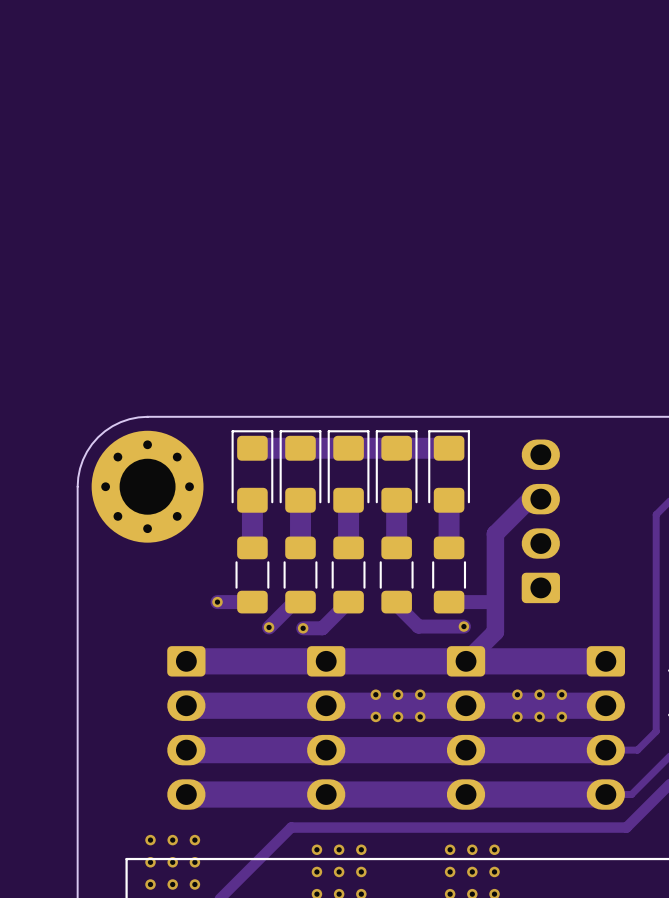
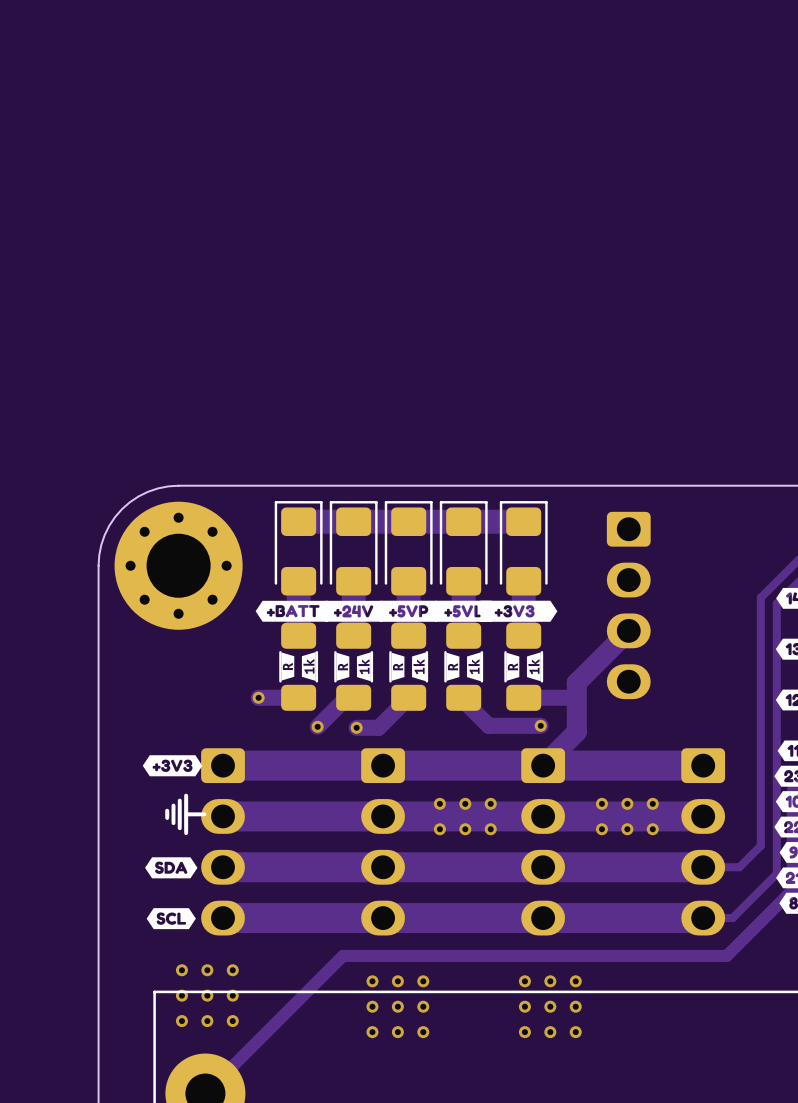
track: (540, 499) (530, 499) (495, 533) (495, 589) -> (628, 630) (576, 682)
drawing: none -> [255, 600, 558, 622]
part rotation: 0° (540, 521) -> 180° (628, 605)
drawing: none -> [281, 652, 481, 682]
drawing: none -> [506, 652, 541, 682]
drawing: none -> [142, 755, 207, 879]
drawing: none -> [146, 908, 196, 930]

